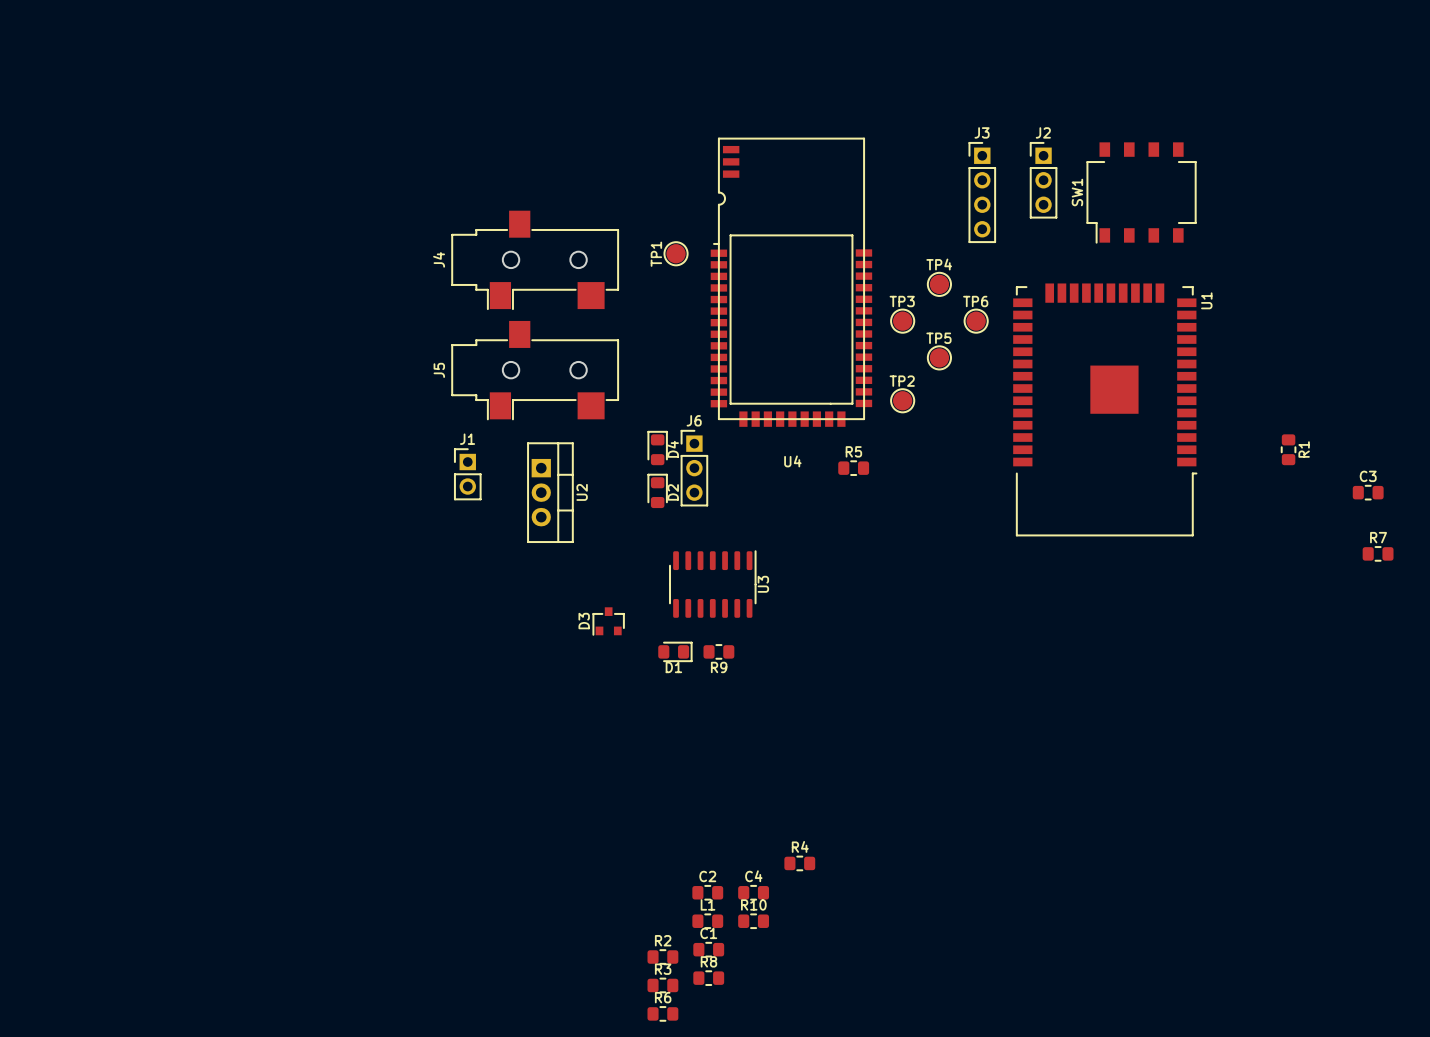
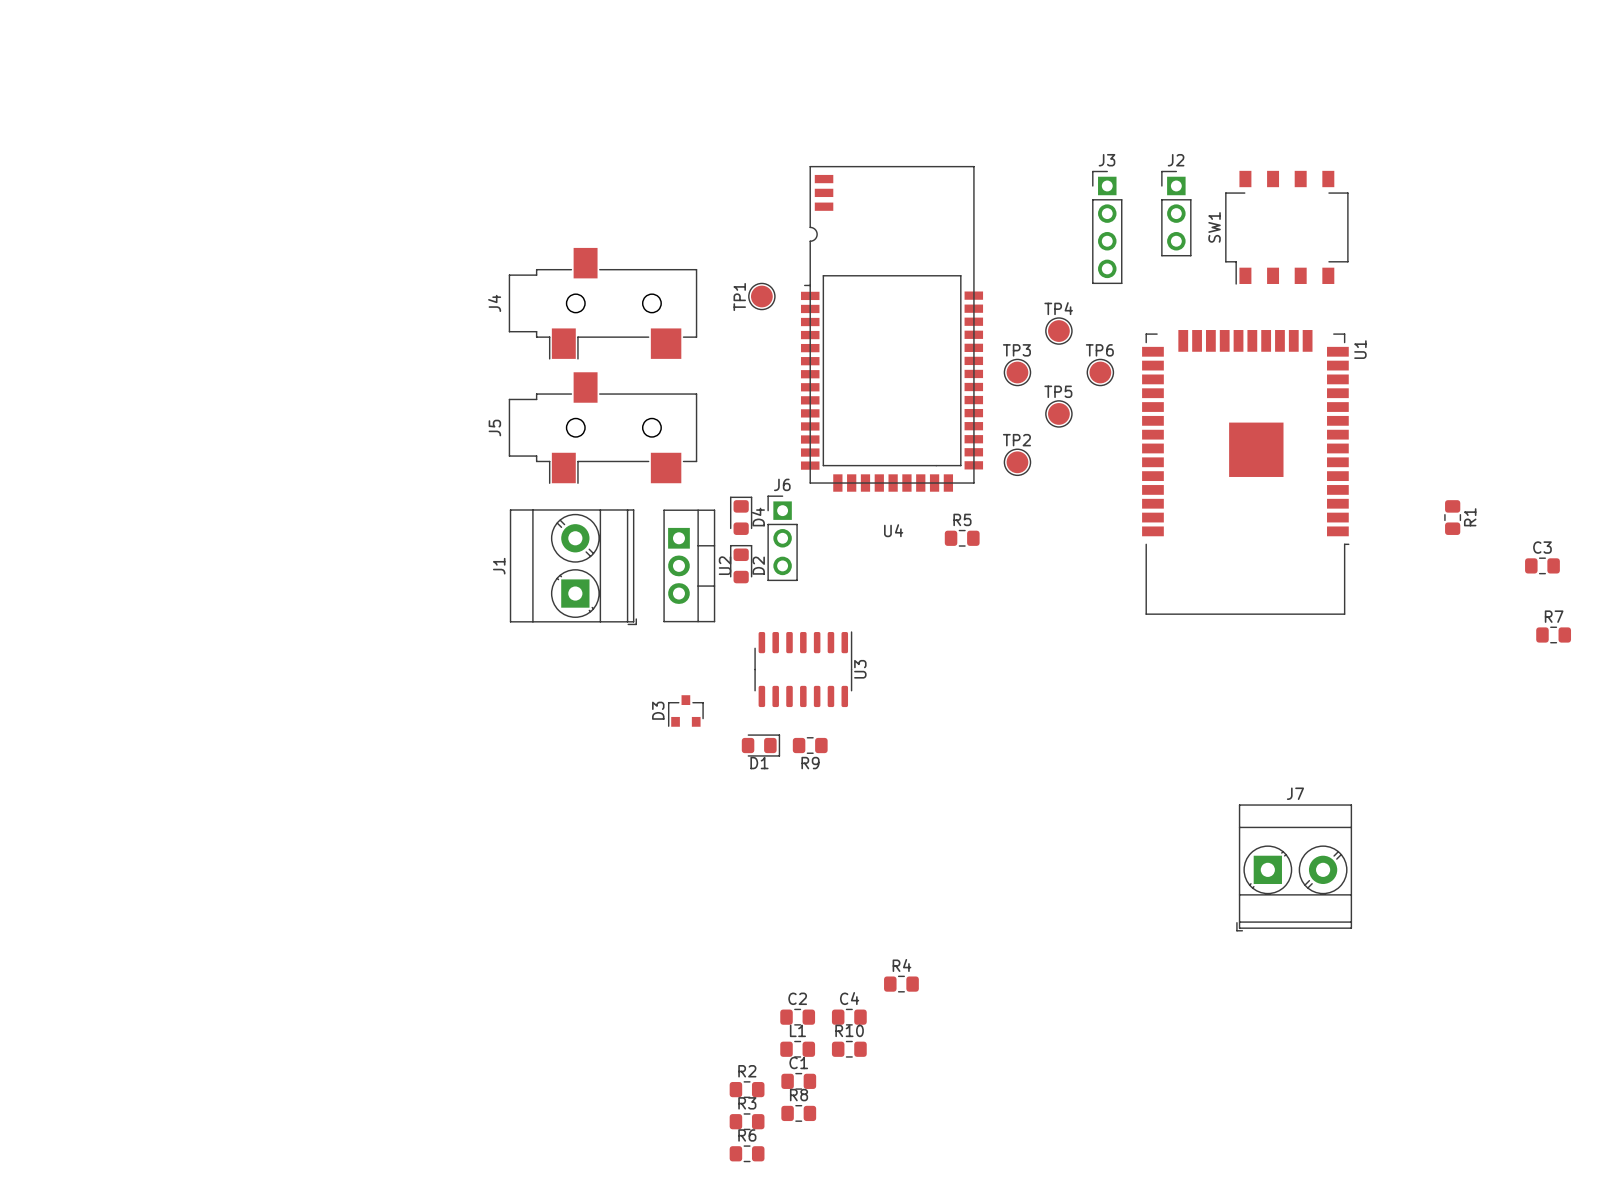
J1 name position: J1 (467, 439) -> J1 (499, 566)
J1 footprint: [454, 448, 482, 500] -> [509, 509, 637, 626]
U2 position: (550, 492) -> (689, 565)
J7: none -> (1294, 867)

